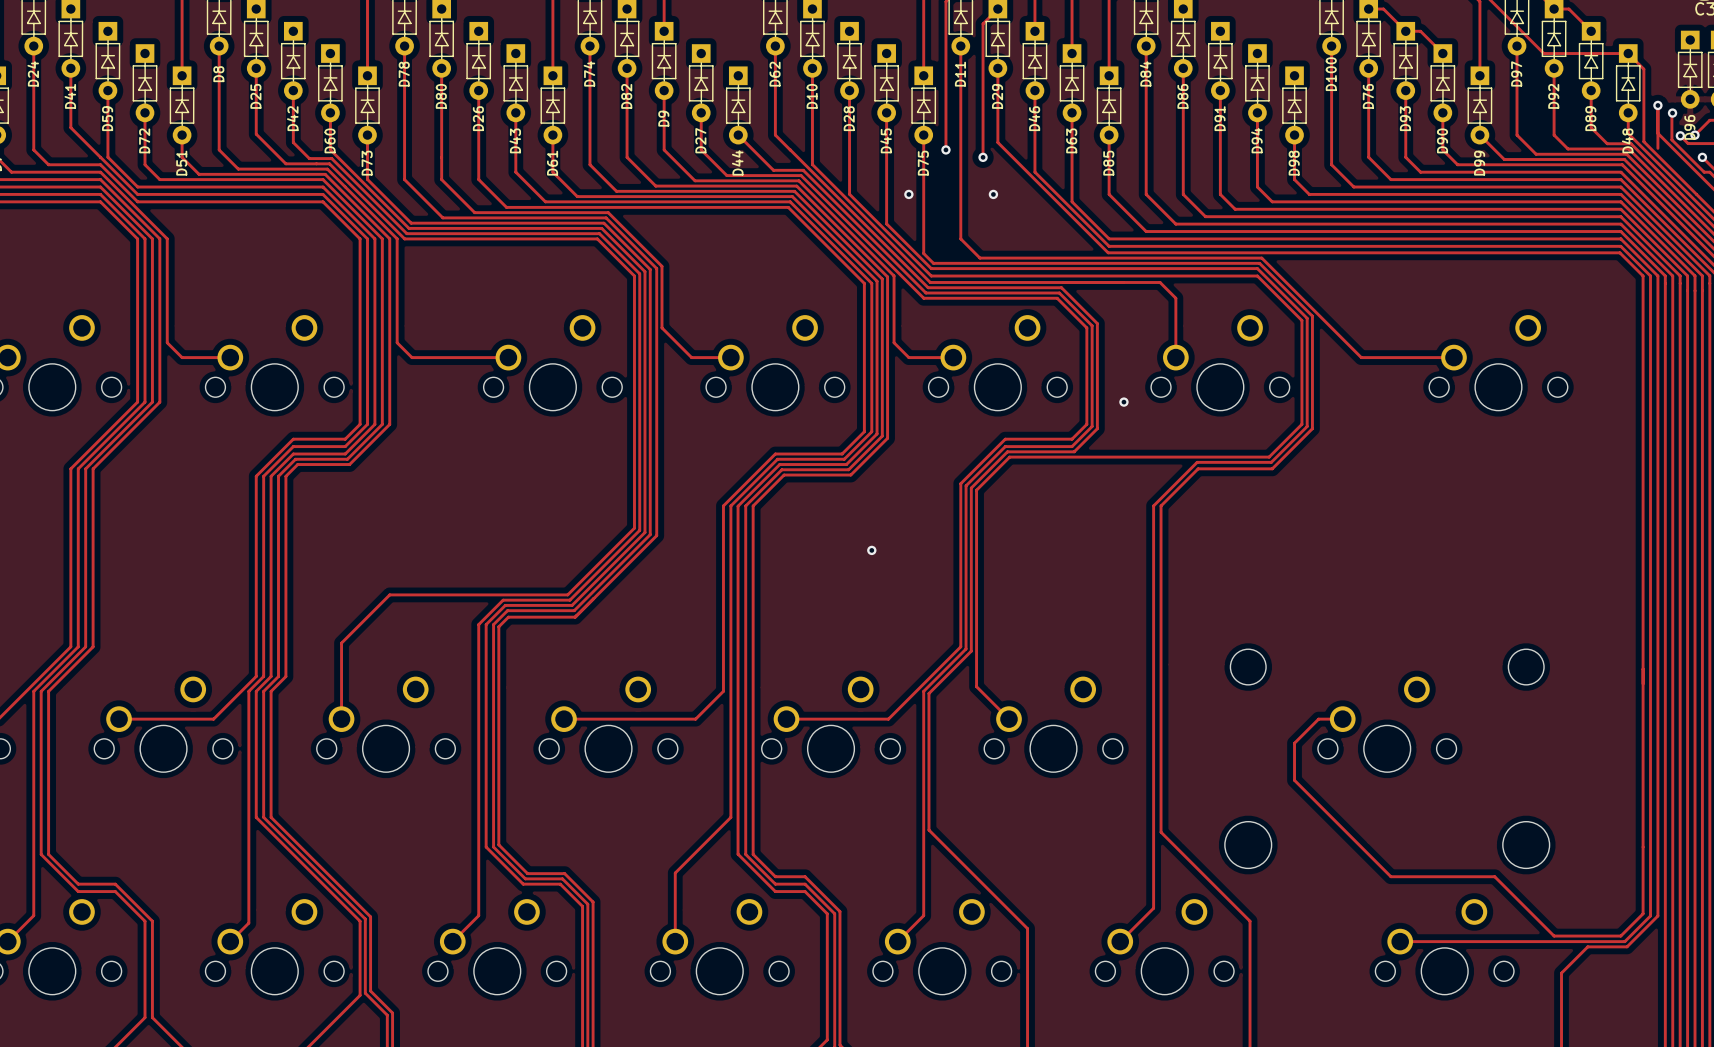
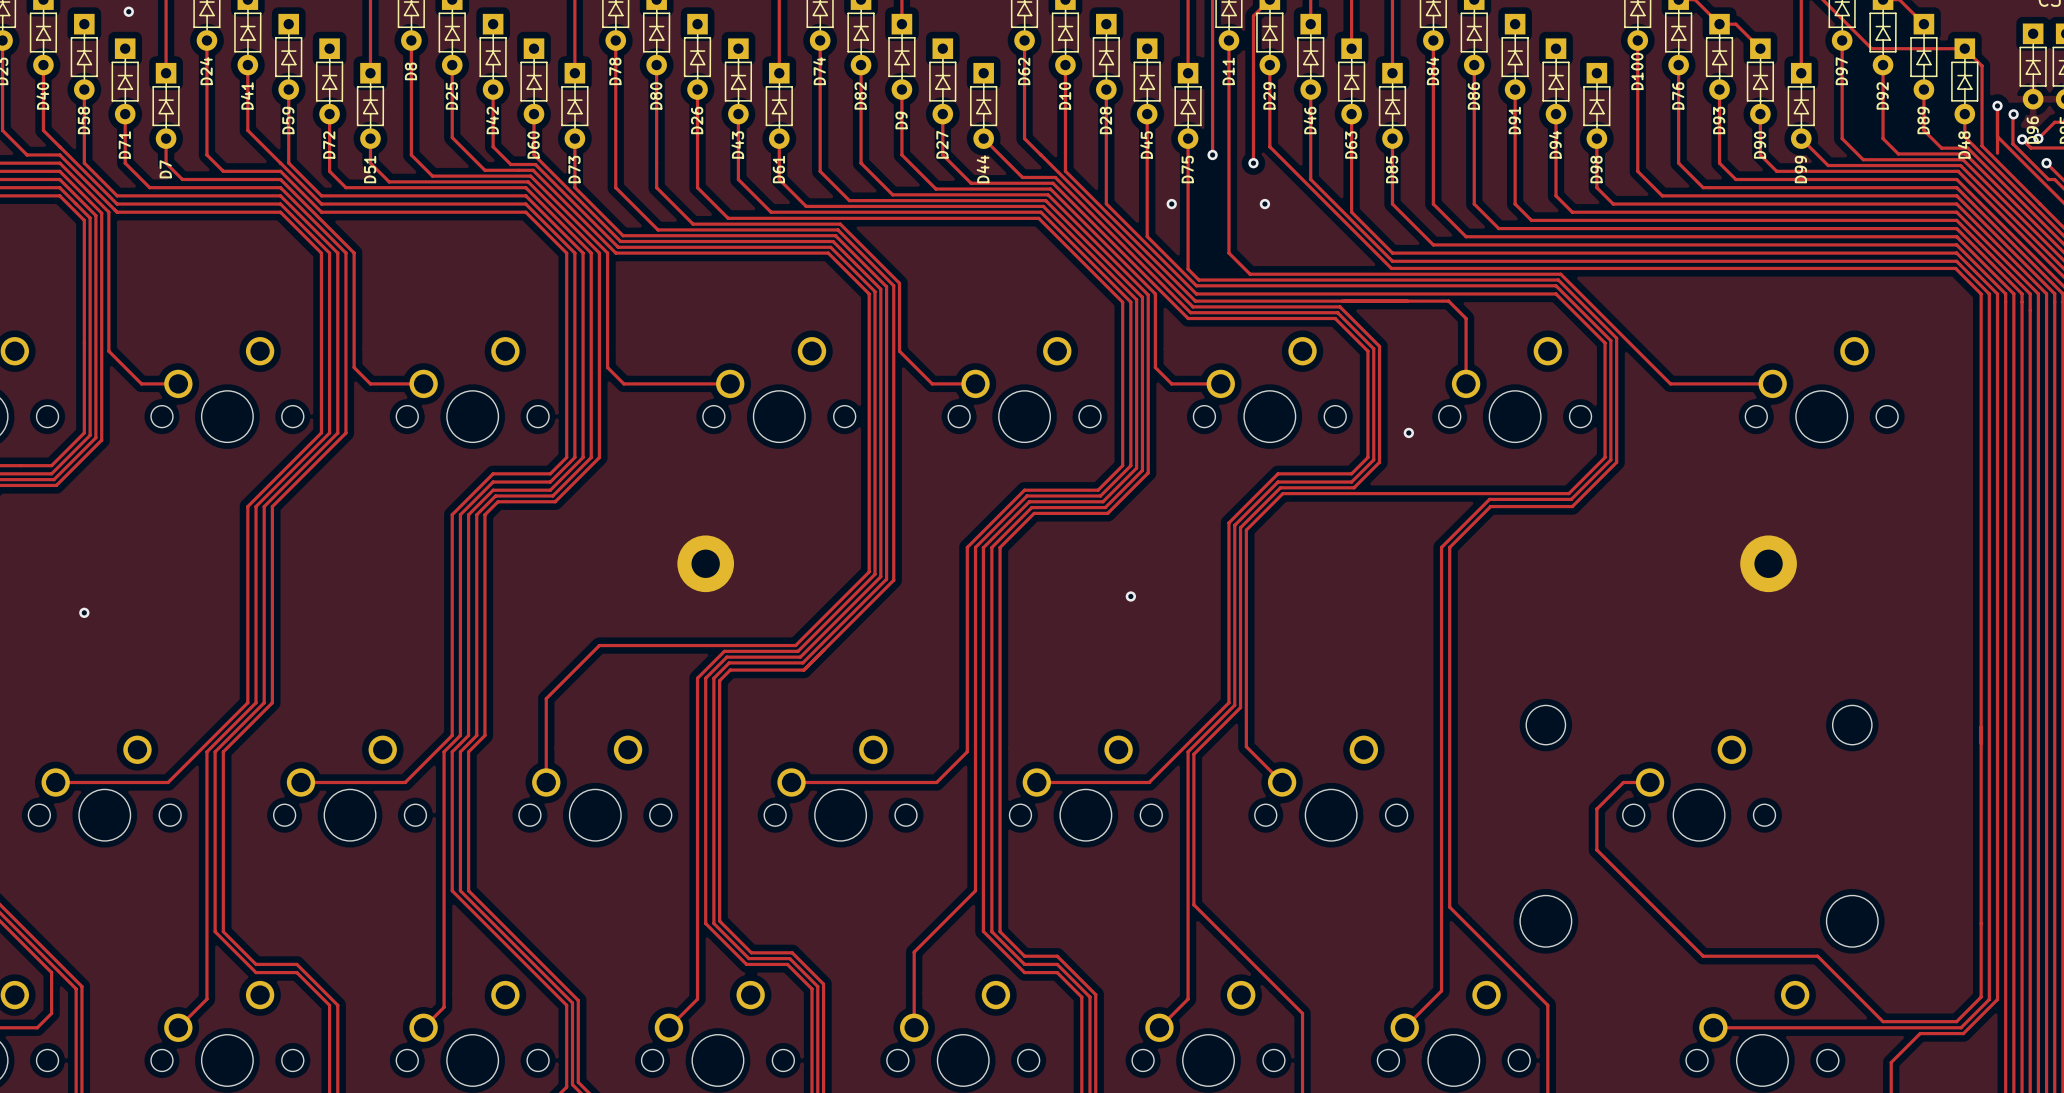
part: none -> (705, 563)
part: none -> (1768, 563)

